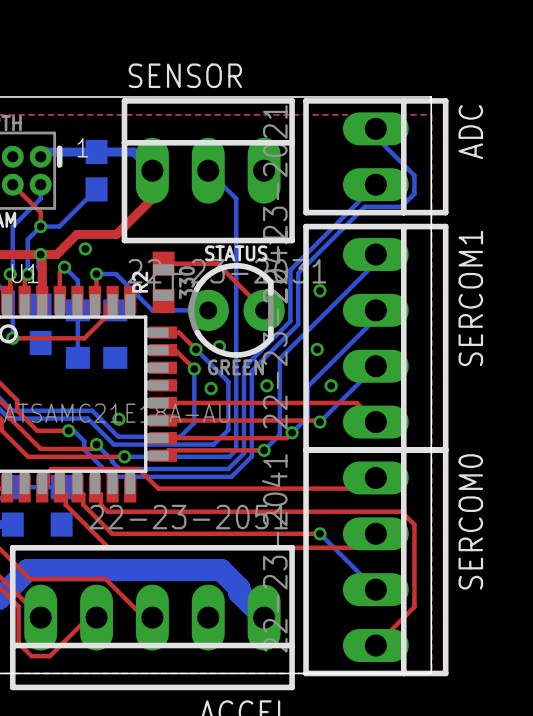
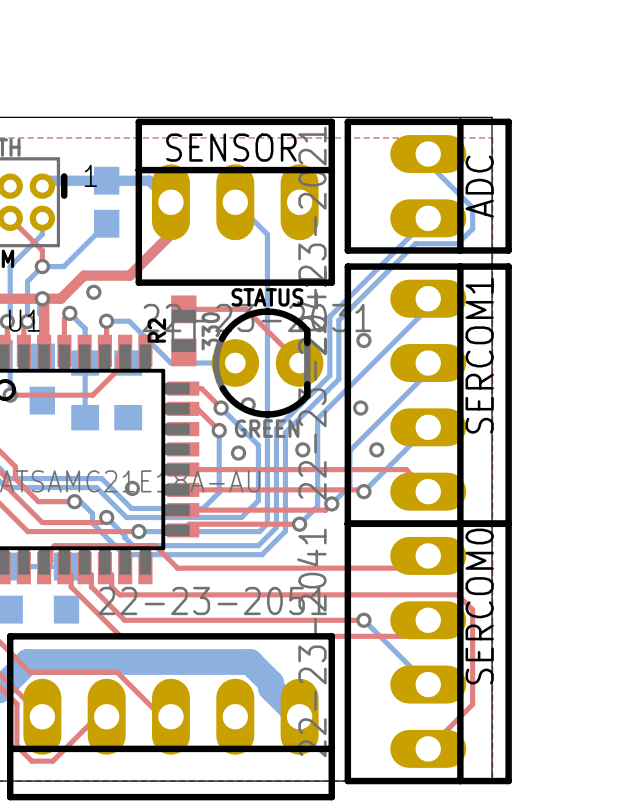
SENSOR name position: SENSOR (185, 75) -> SENSOR (231, 147)
ADC name position: ADC (470, 132) -> ADC (479, 186)
SERCOM1 name position: SERCOM1 (470, 298) -> SERCOM1 (479, 355)
SERCOM0 name position: SERCOM0 (470, 521) -> SERCOM0 (479, 606)

